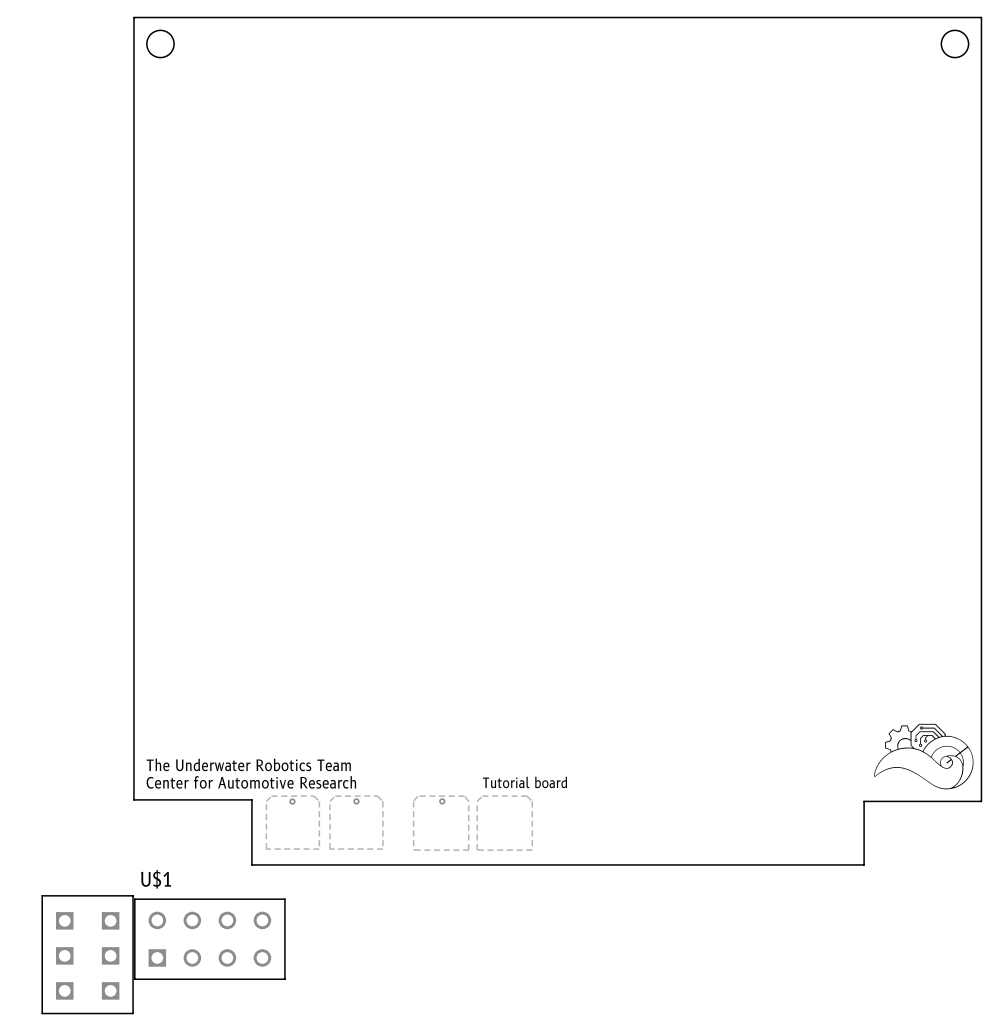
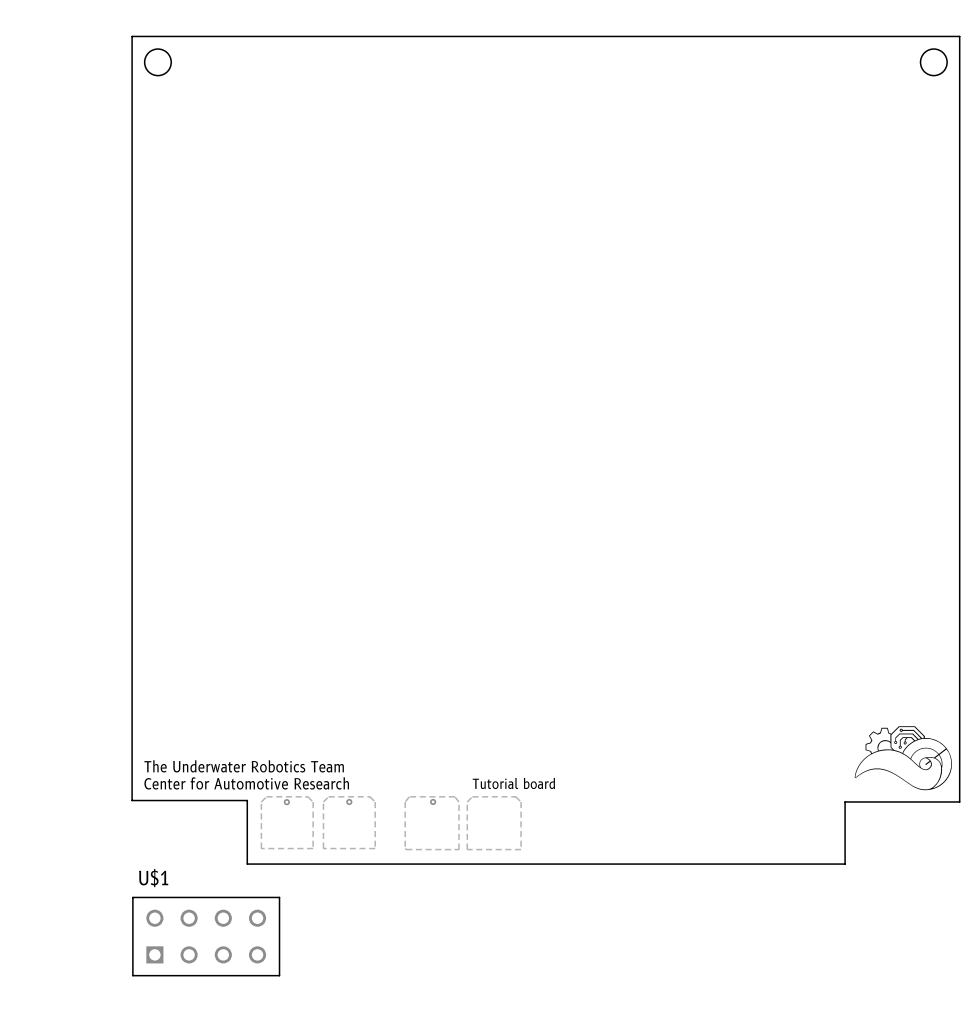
part: (87, 954) -> none

